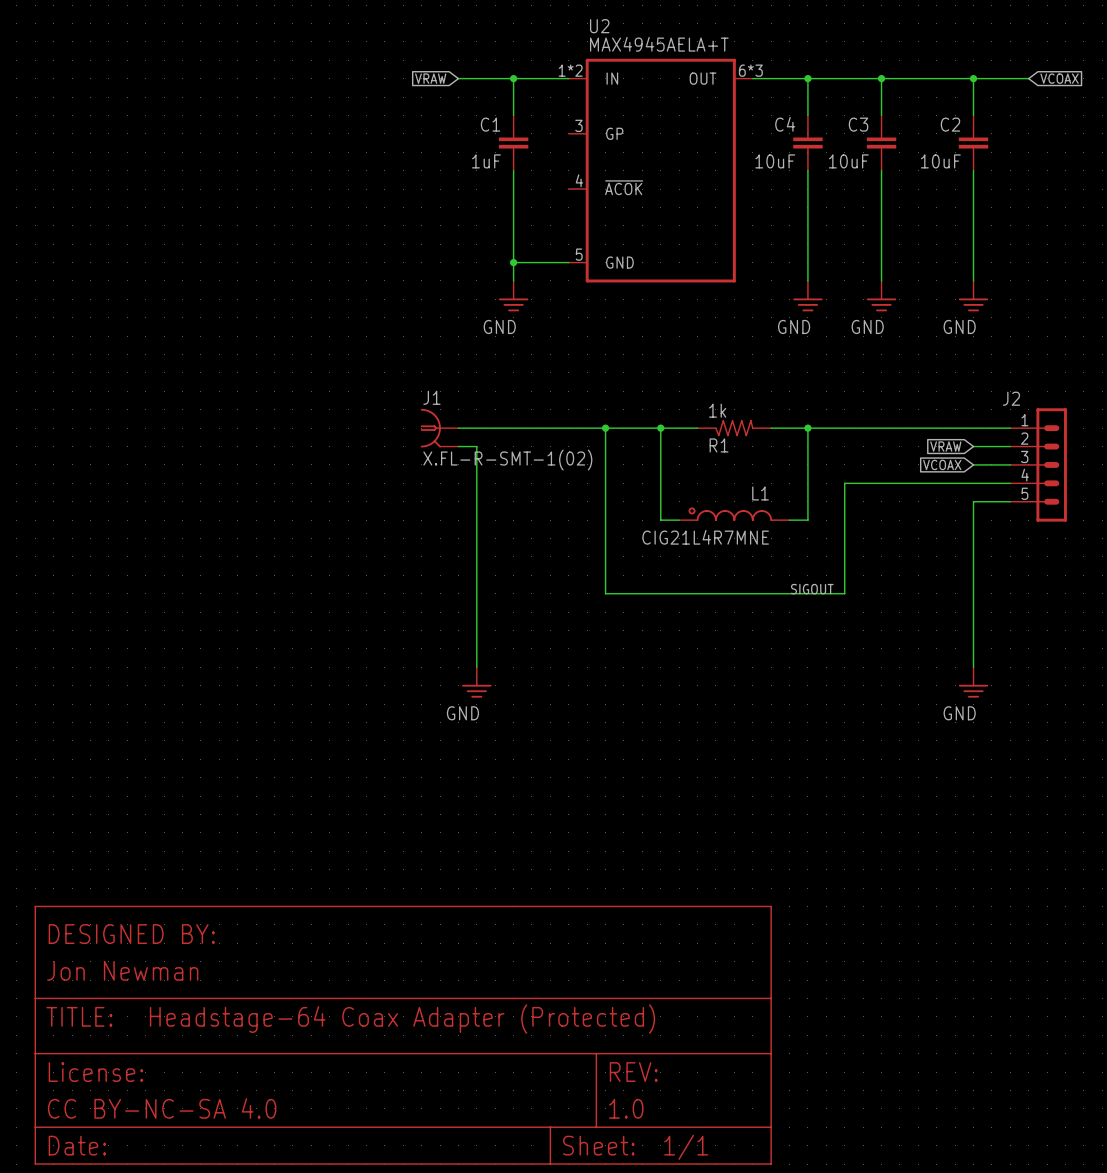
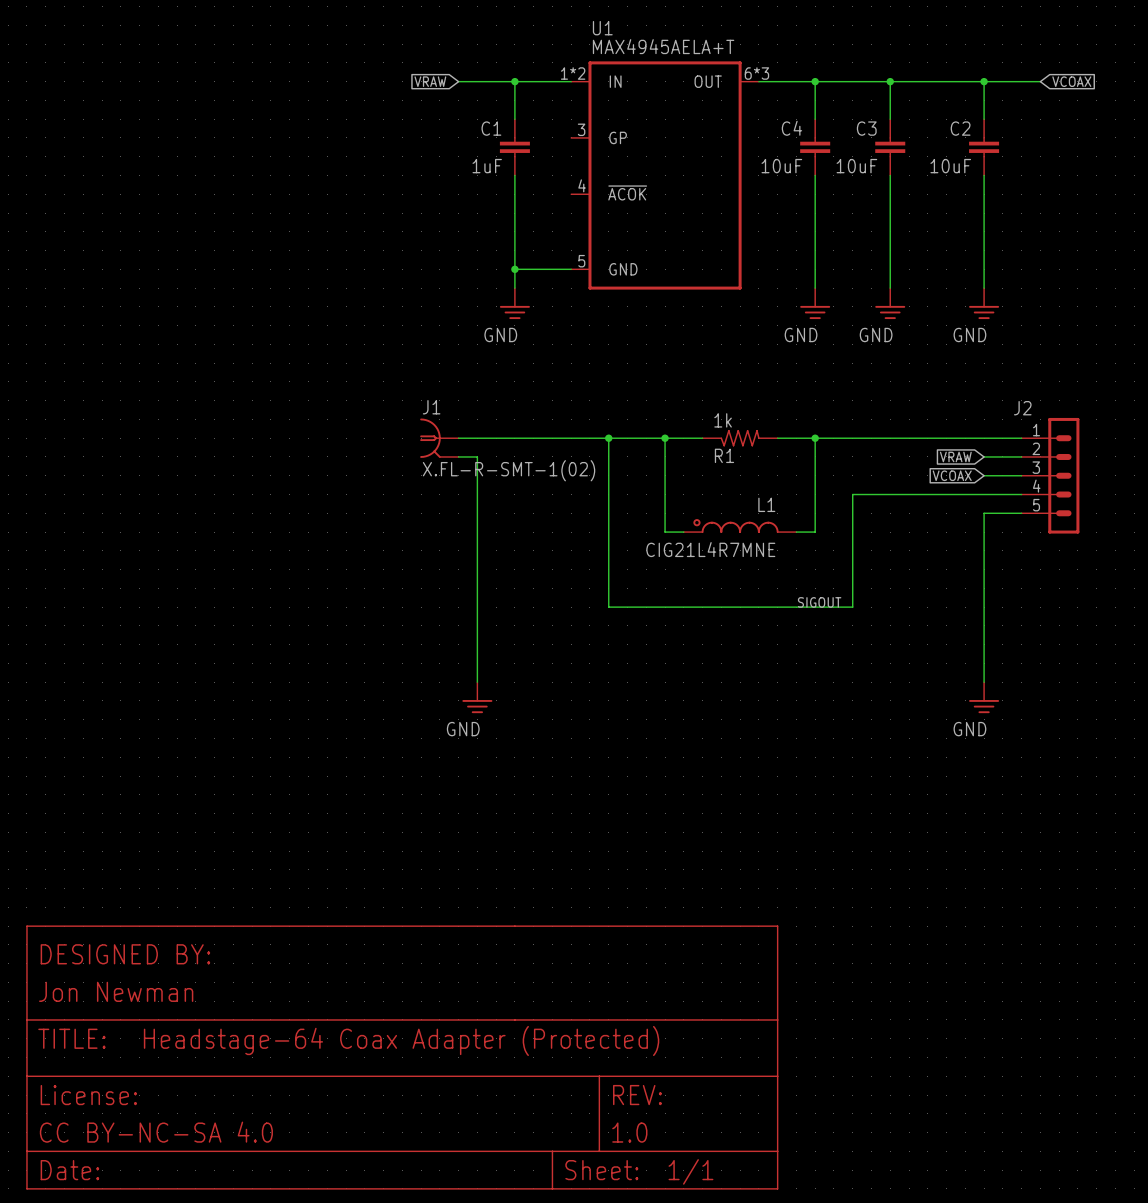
U2 name: U2 (599, 26) -> U1 (602, 28)

